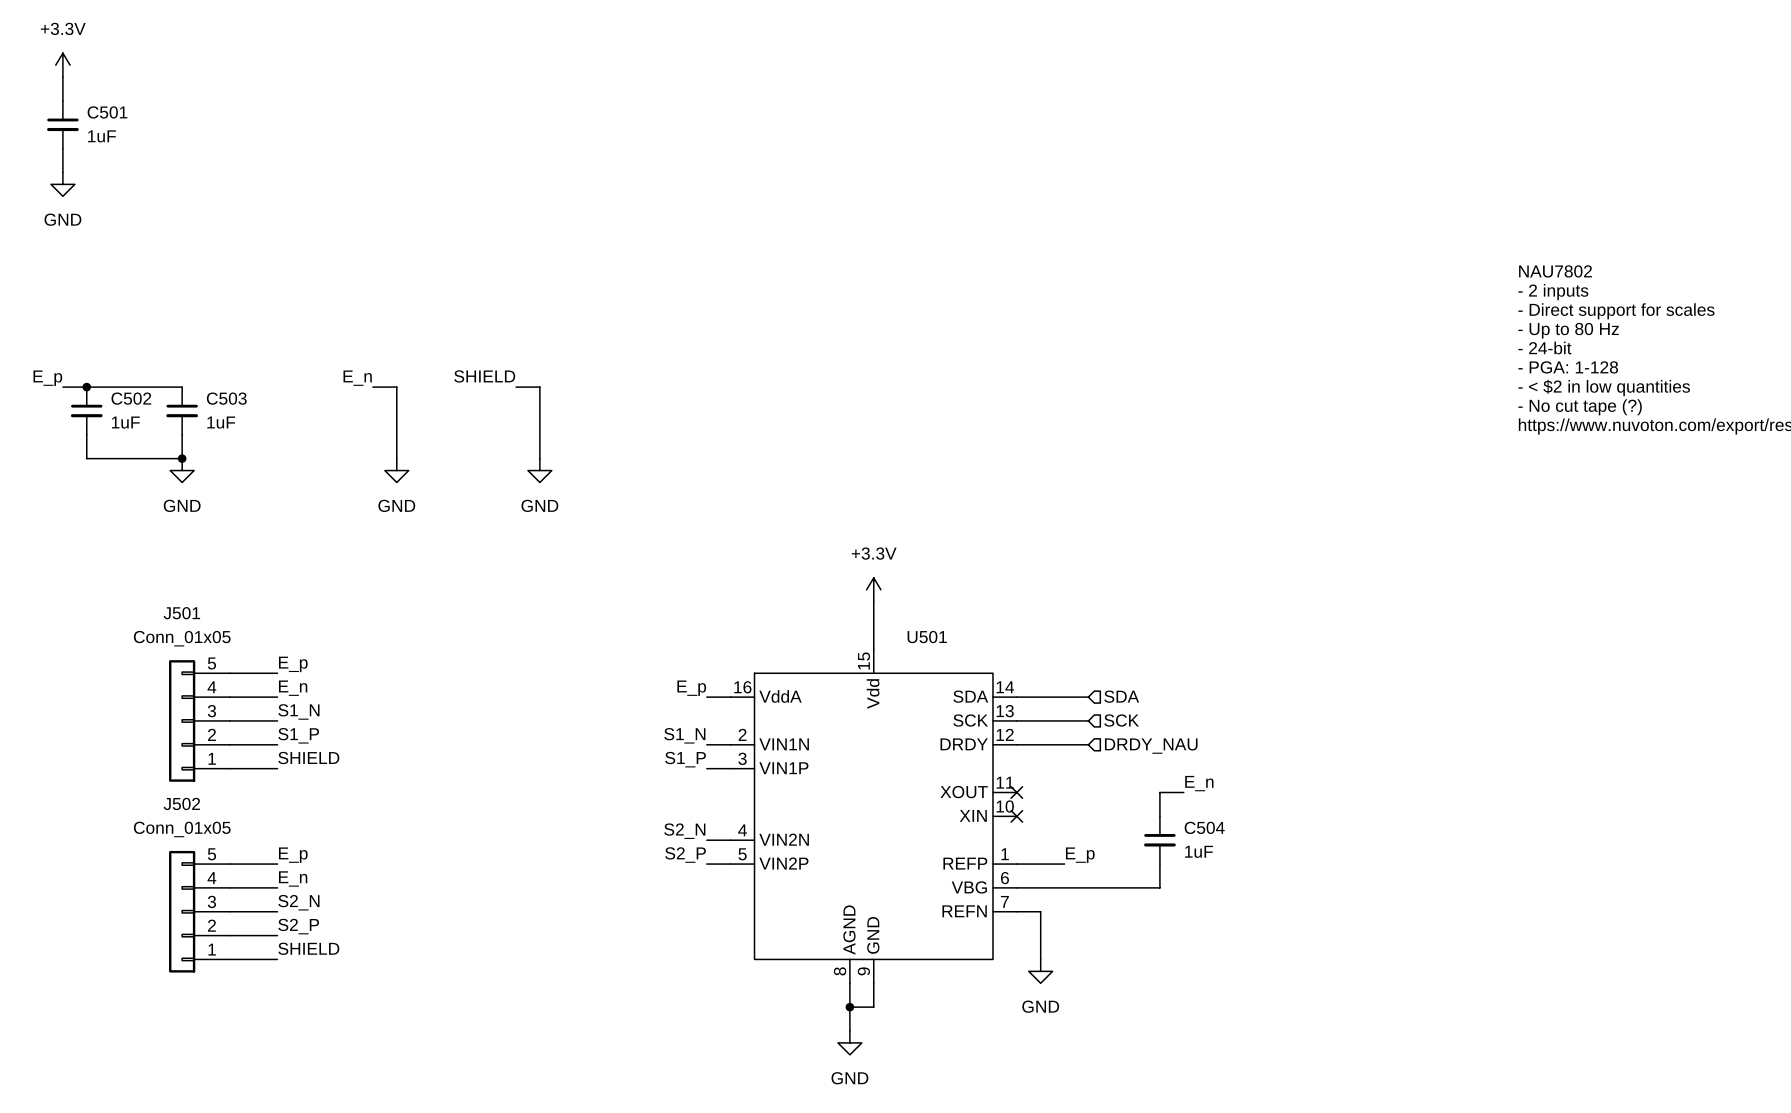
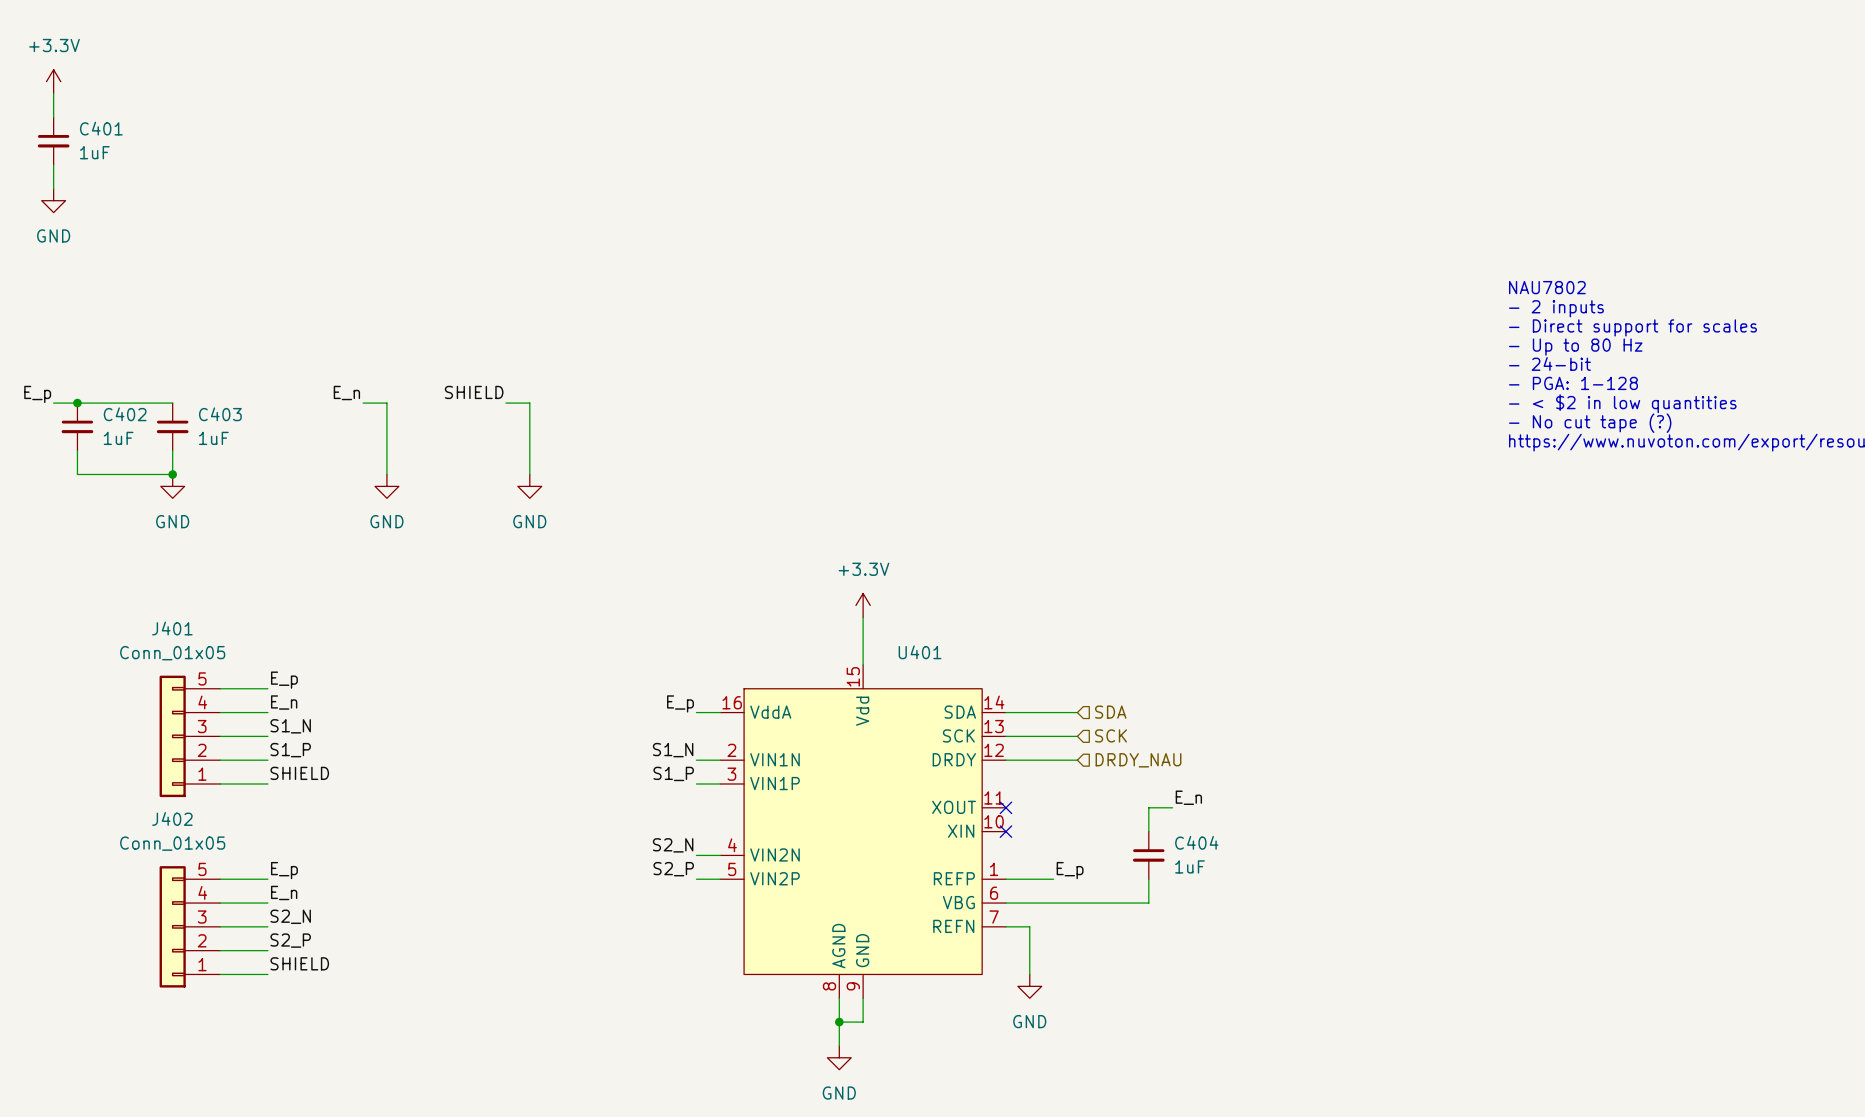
C501 name: C501 (107, 112) -> C401 (101, 128)
C502 name: C502 (131, 398) -> C402 (125, 414)
C503 name: C503 (226, 398) -> C403 (220, 414)
J501 name: J501 (181, 613) -> J401 (172, 628)
U501 name: U501 (927, 637) -> U401 (920, 652)
J502 name: J502 (181, 803) -> J402 (172, 818)
C504 name: C504 (1204, 827) -> C404 (1196, 842)

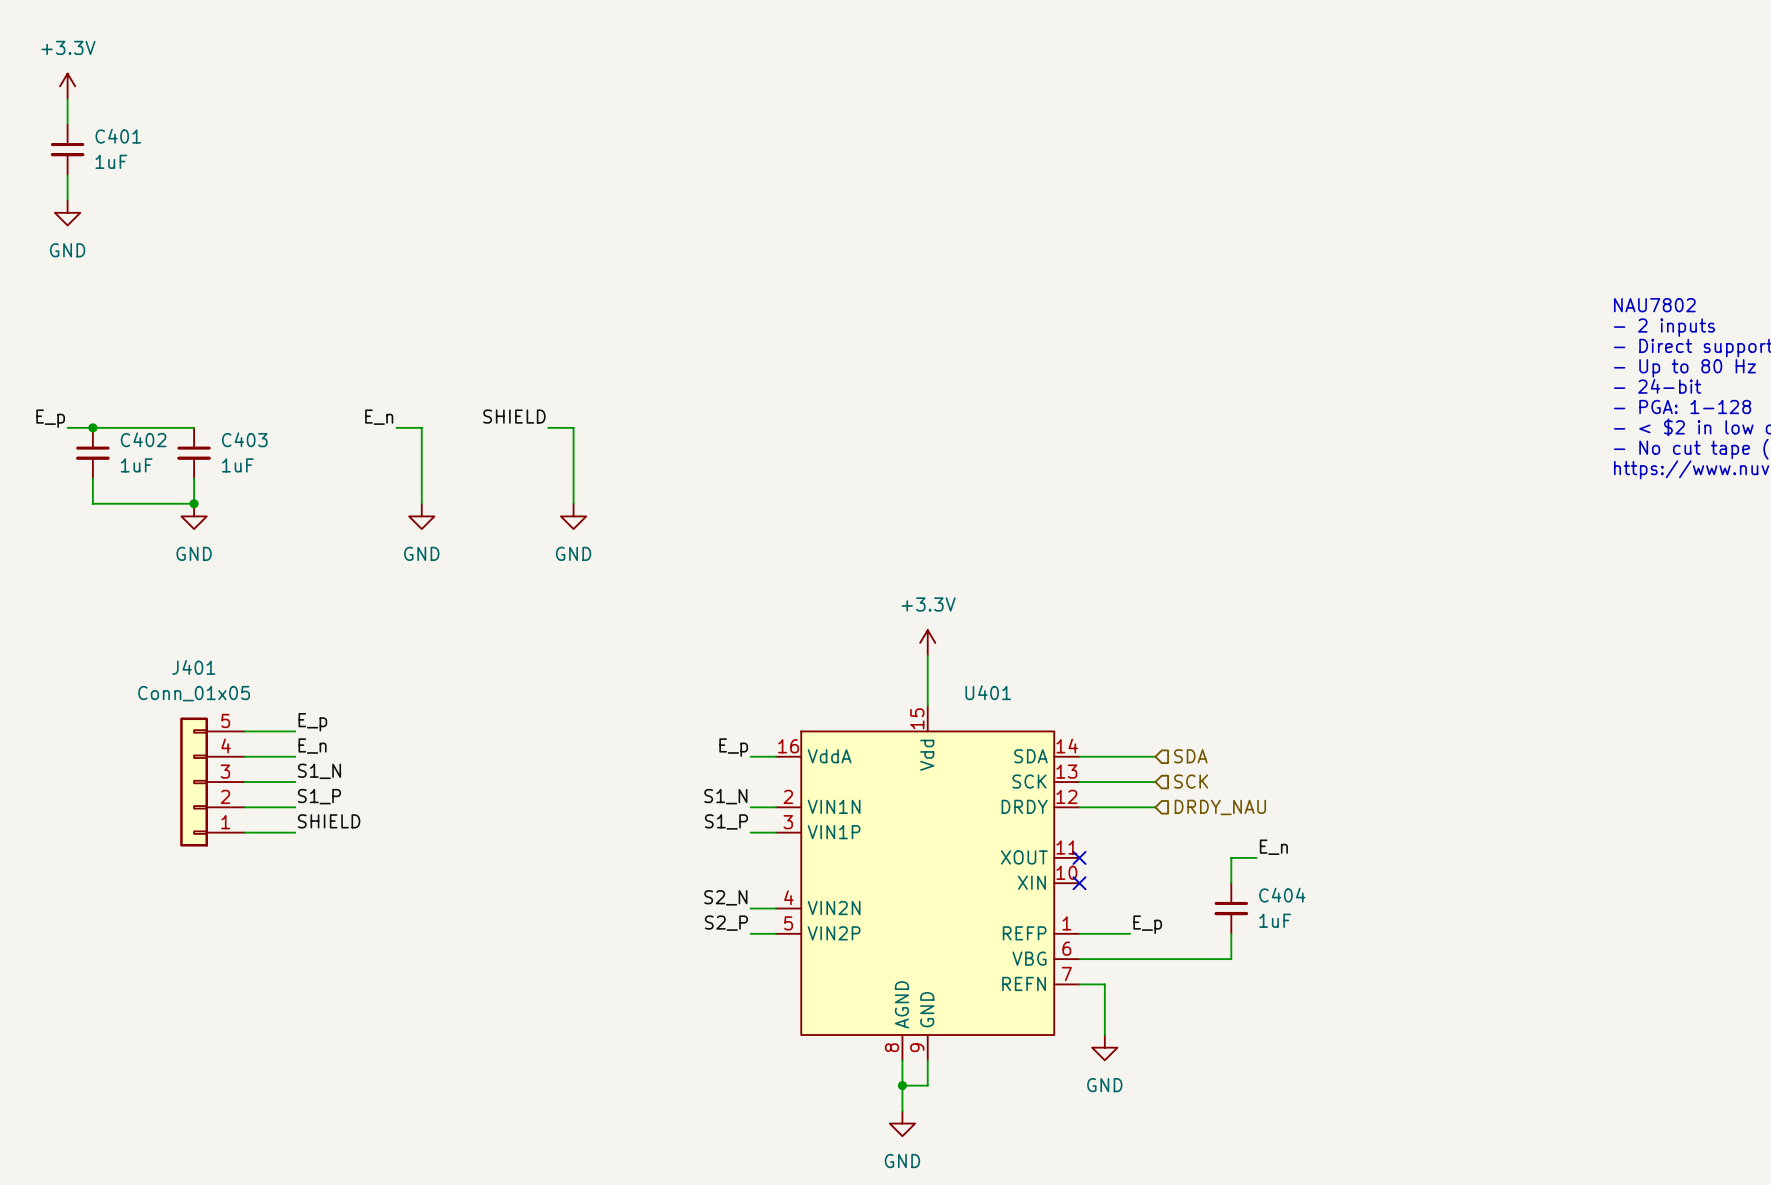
label: E_p (284, 870) -> none
wire: (220, 879) (267, 879) -> none
label: E_n (284, 892) -> none
wire: (220, 903) (267, 903) -> none
label: S2_N (290, 916) -> none
J402: Conn_01x05 (189, 926) -> none
wire: (220, 926) (267, 926) -> none
label: S2_P (290, 940) -> none
wire: (220, 950) (267, 950) -> none
label: SHIELD (299, 963) -> none
wire: (220, 974) (267, 974) -> none

